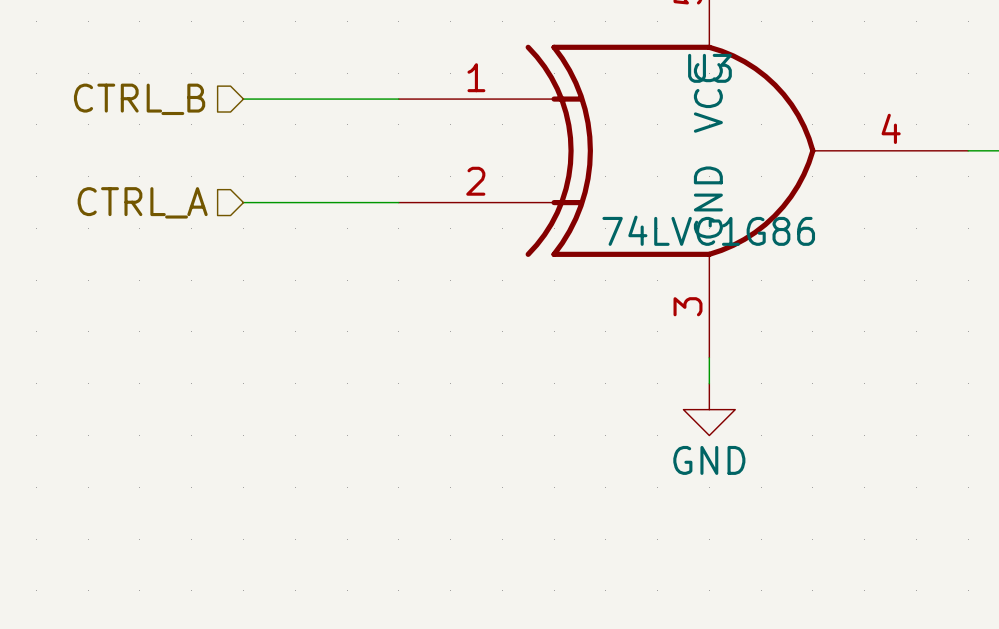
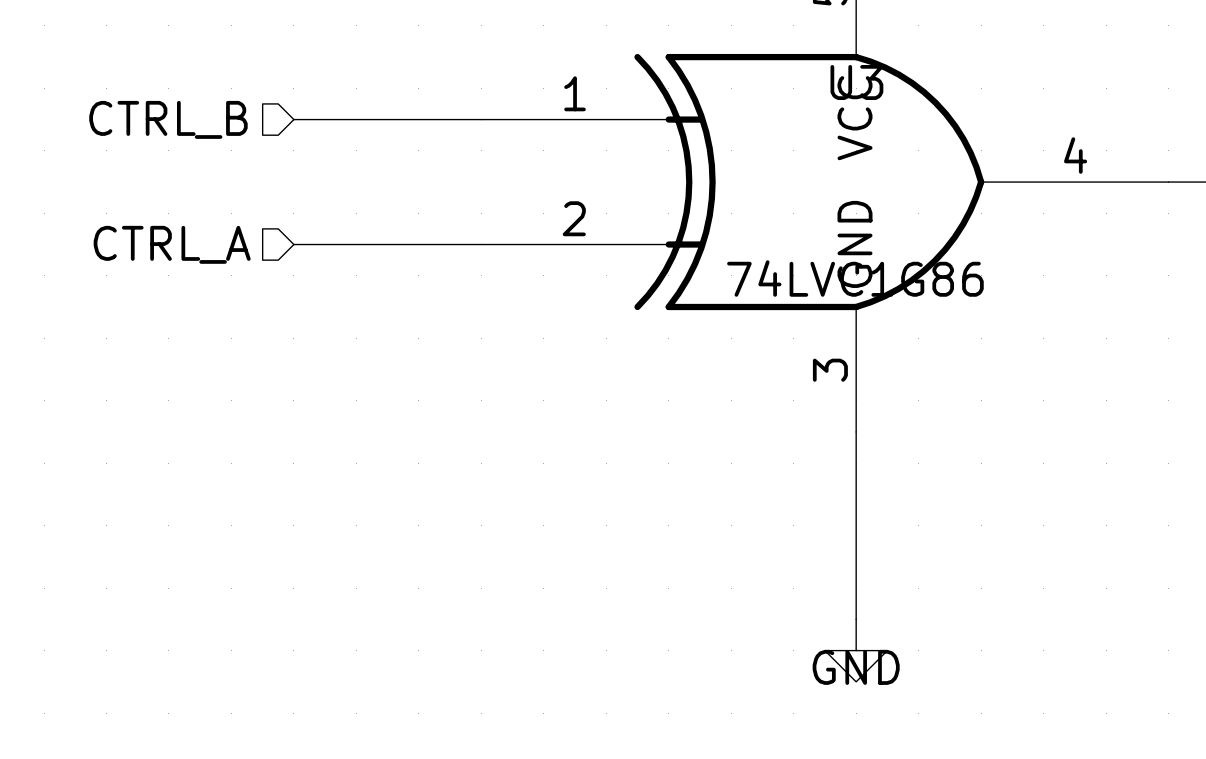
wire: none -> (856, 463) (856, 619)
power symbol position: GND (709, 409) -> GND (856, 650)
power symbol text position: GND (709, 460) -> GND (856, 667)

